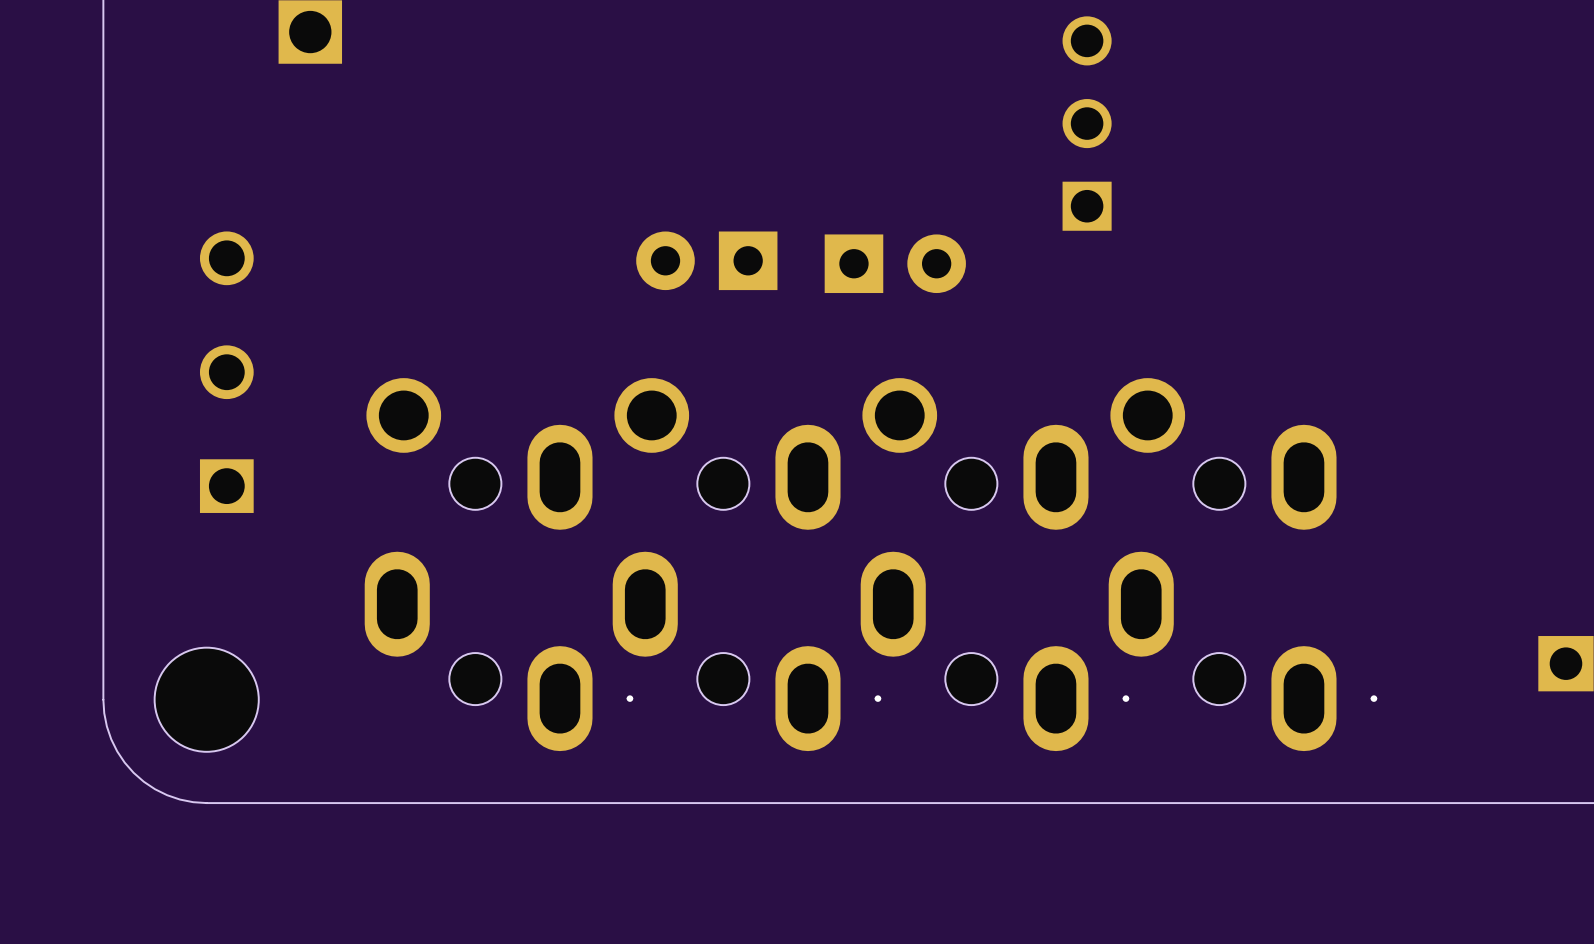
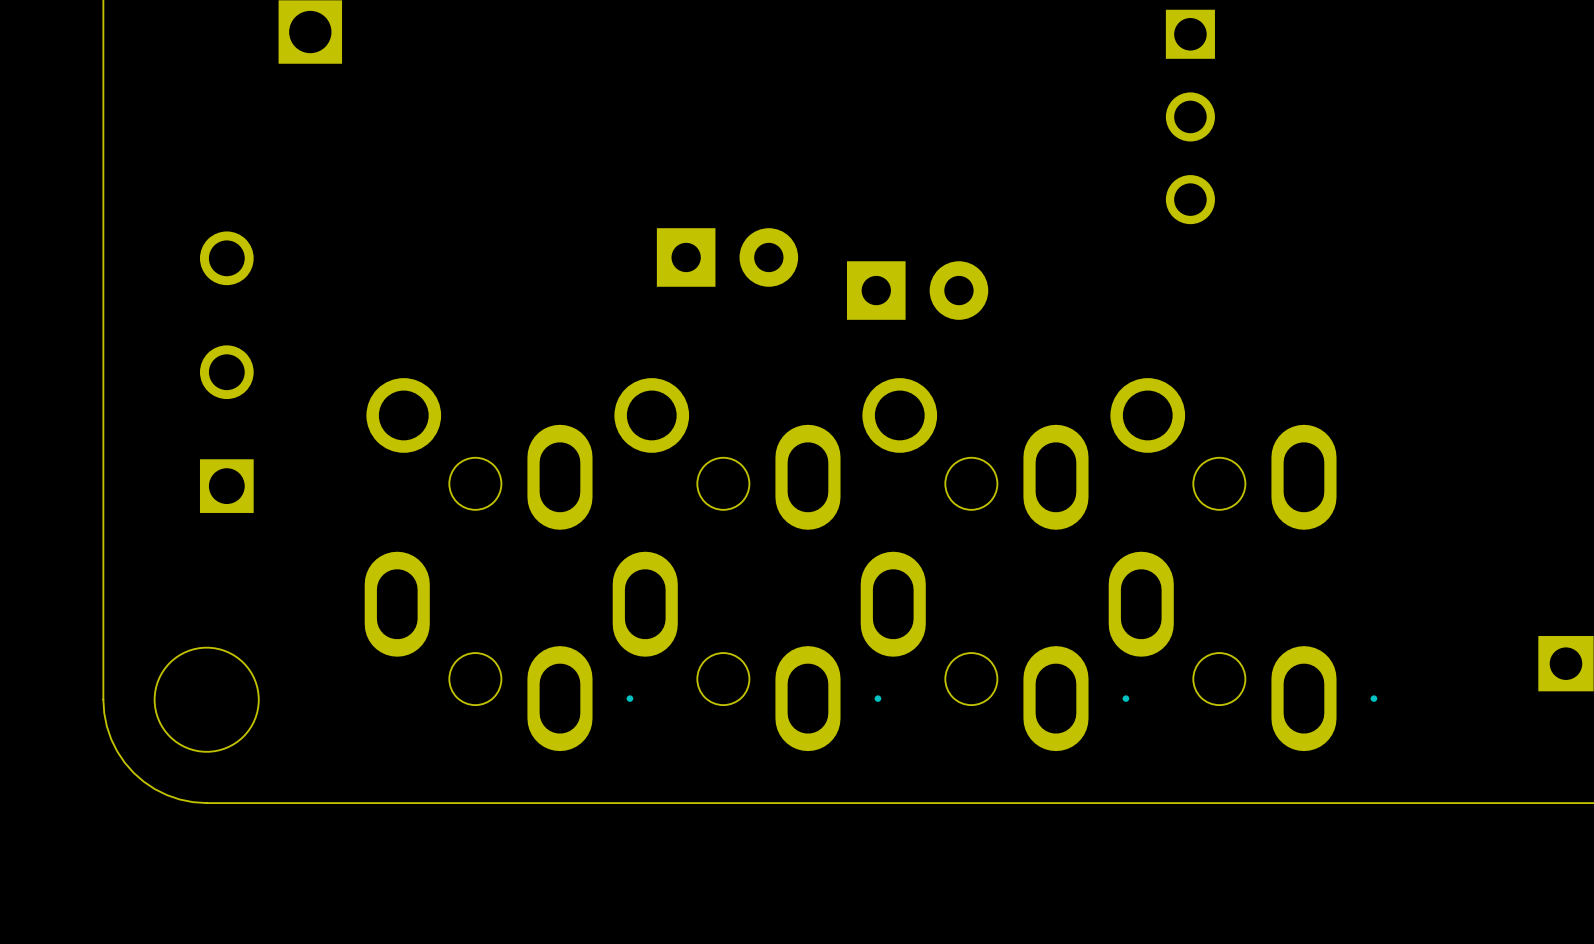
part rotation: 0° (1087, 123) -> 180° (1190, 116)
part rotation: 0° (706, 260) -> 180° (727, 257)
part position: (895, 263) -> (917, 290)

